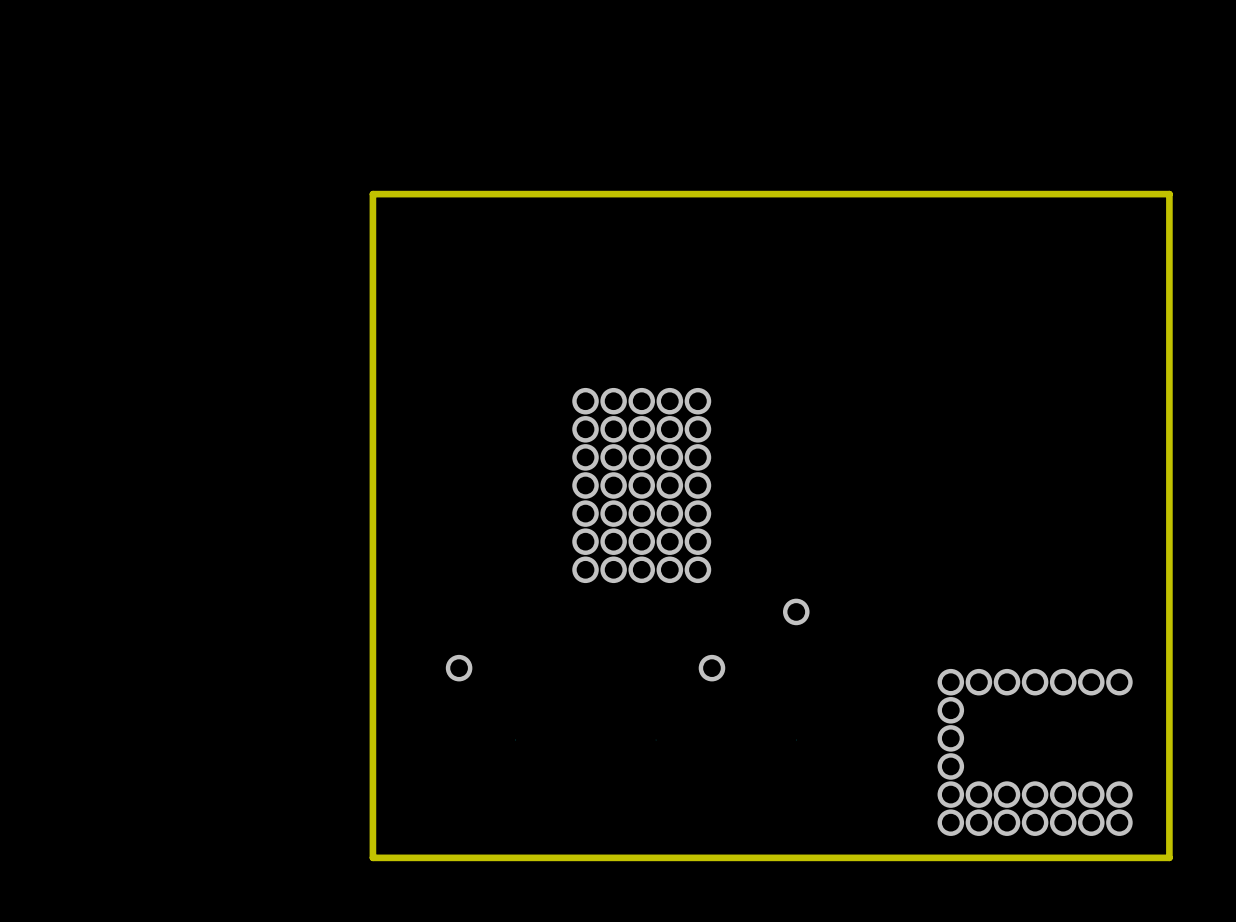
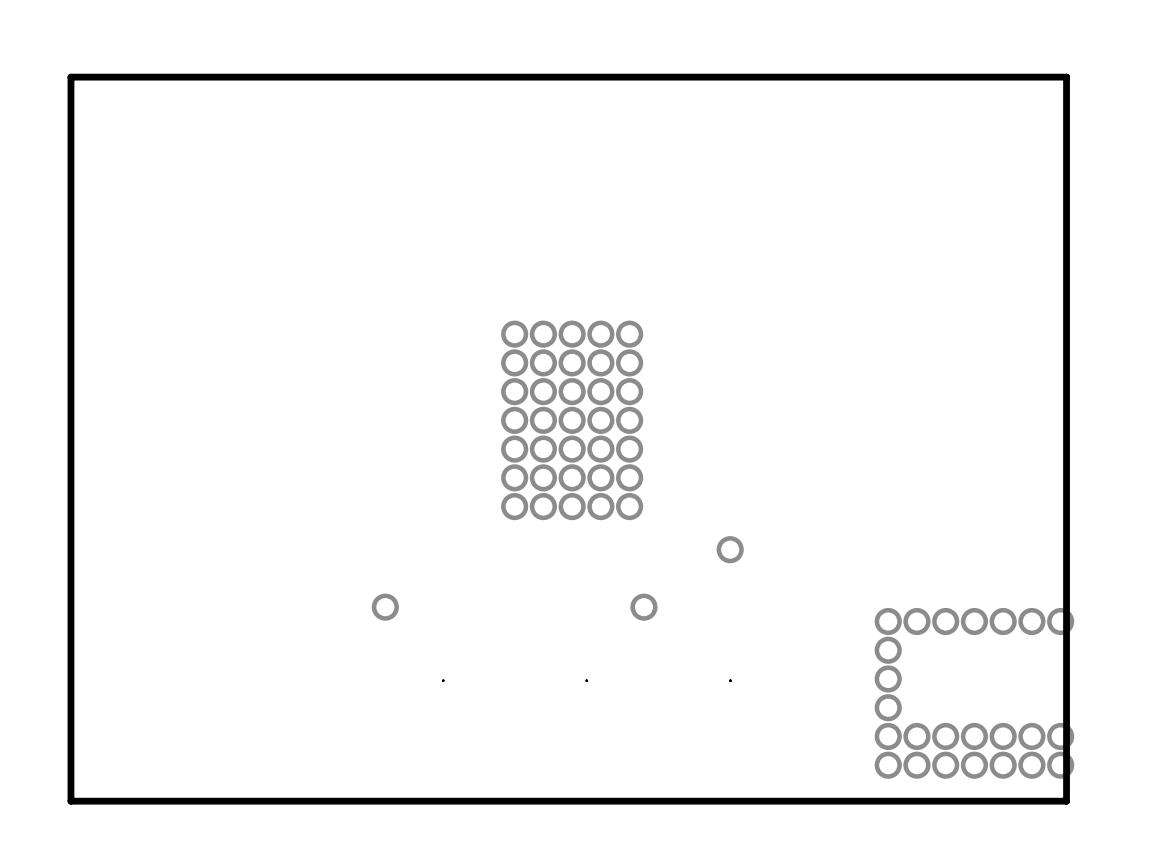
board edge: (1125, 857) (1169, 857) (1169, 194) (372, 194) (372, 857) -> (1066, 801) (1066, 77) (70, 77) (70, 801) (297, 801)

